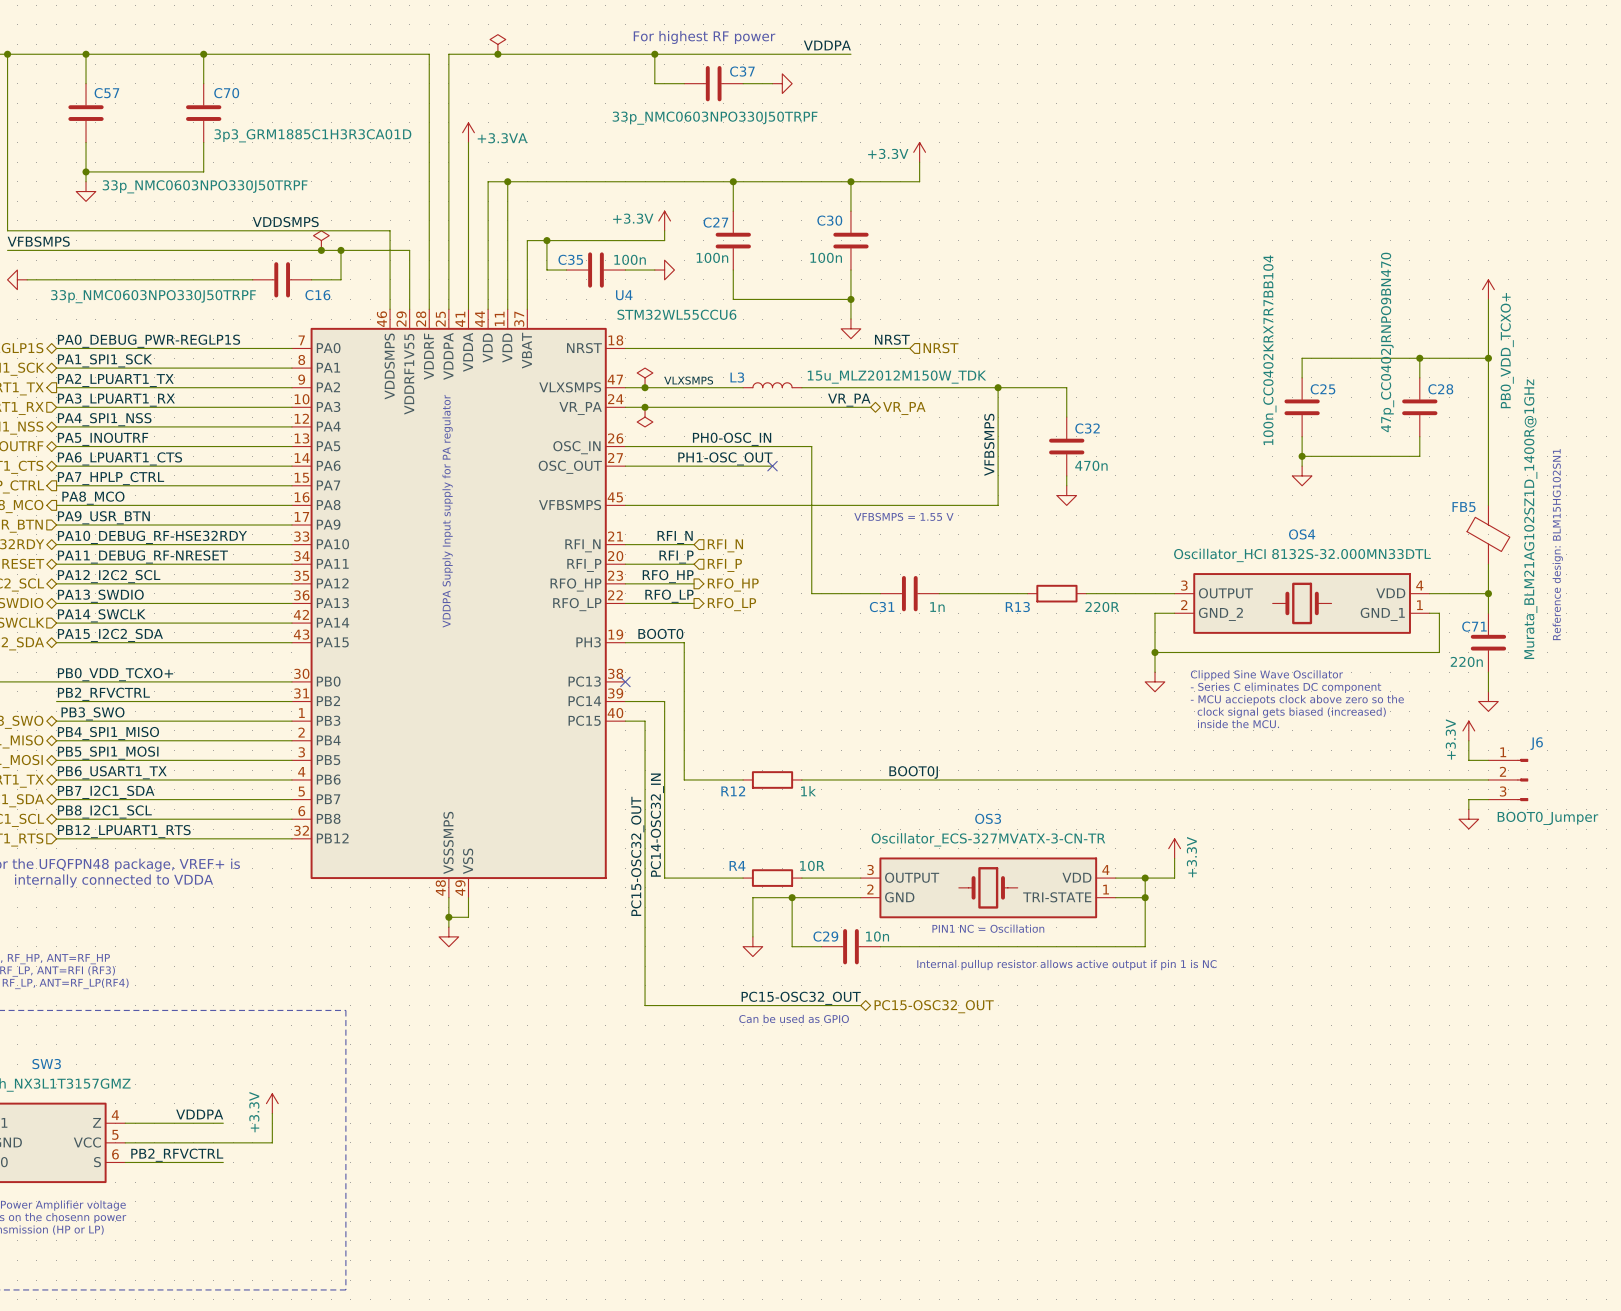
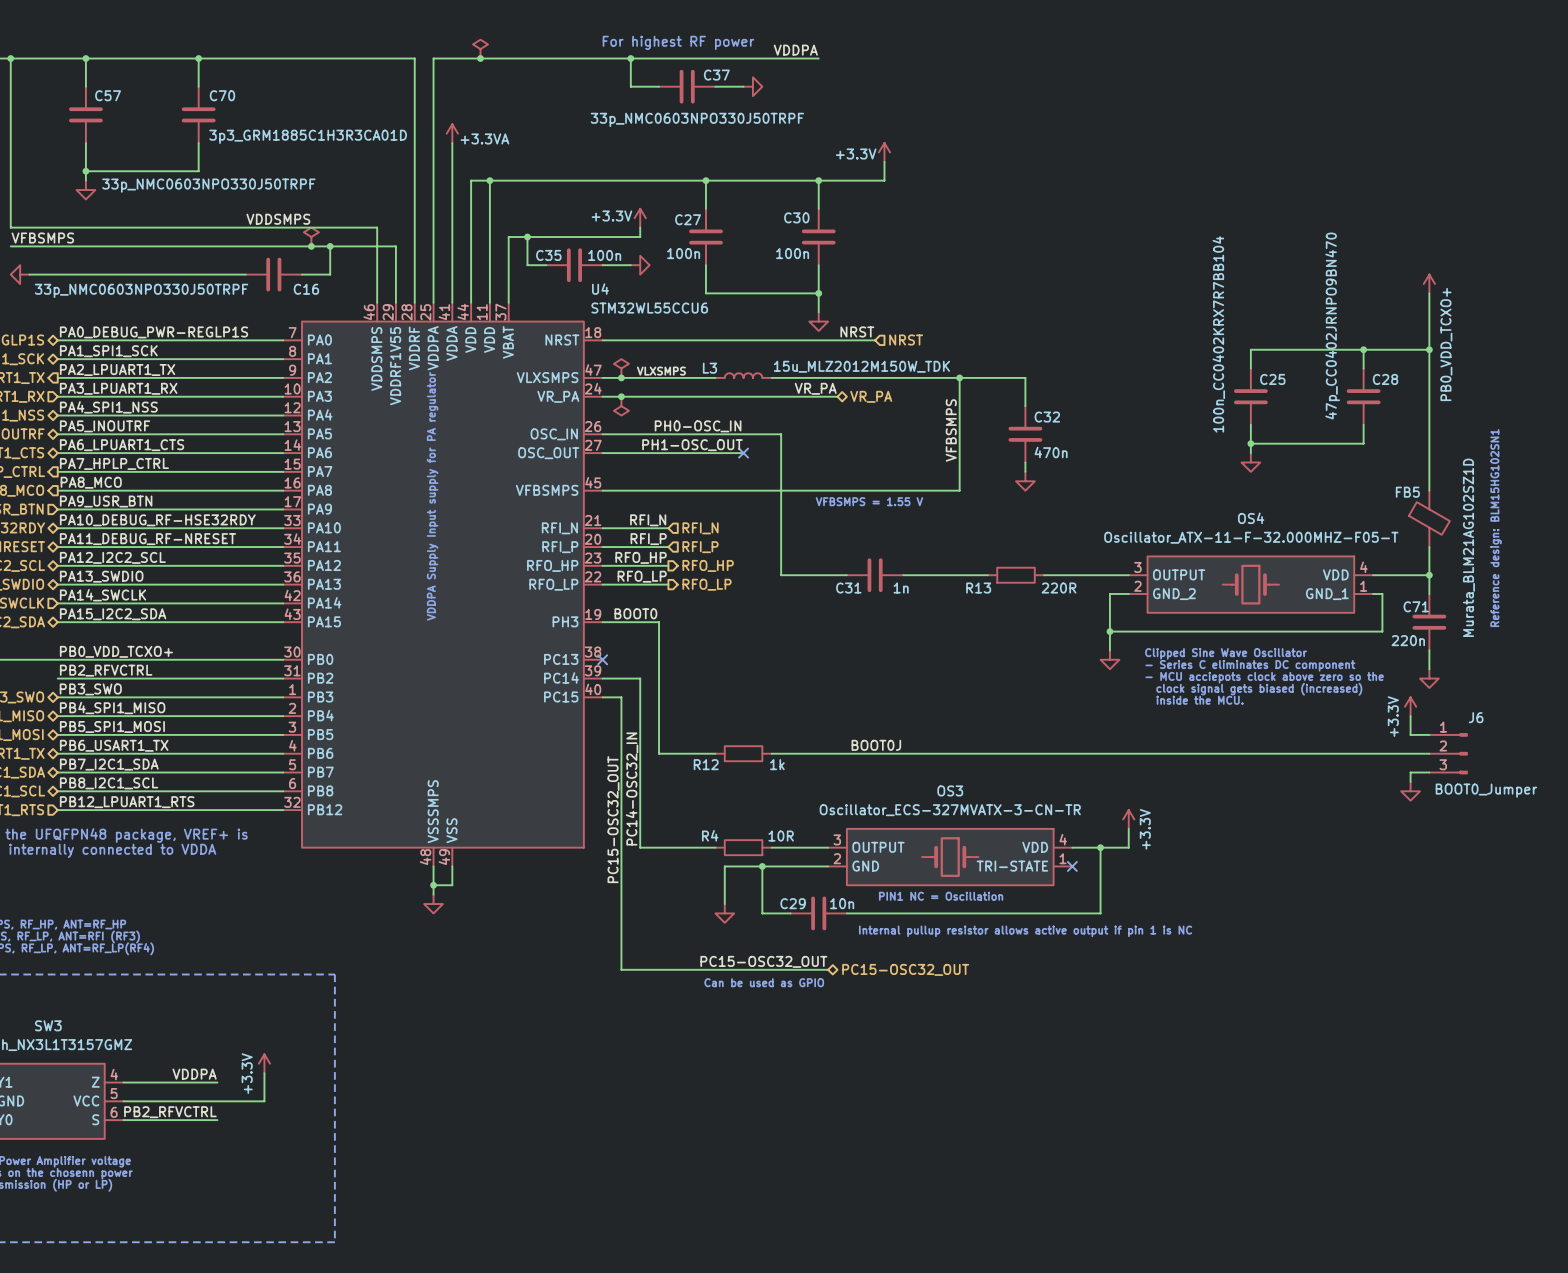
FB5 value: Murata_BLM21AG102SZ1D_1400R@1GHz (1530, 519) -> Murata_BLM21AG102SZ1D (1468, 547)
OS4 value: Oscillator_HCI 8132S-32.000MN33DTL (1302, 555) -> Oscillator_ATX-11-F-32.000MHZ-F05-T (1251, 537)
wire: (1115, 897) (1145, 897) -> none
no-connect mark: none -> (1072, 866)
junction: (1145, 897) -> none

